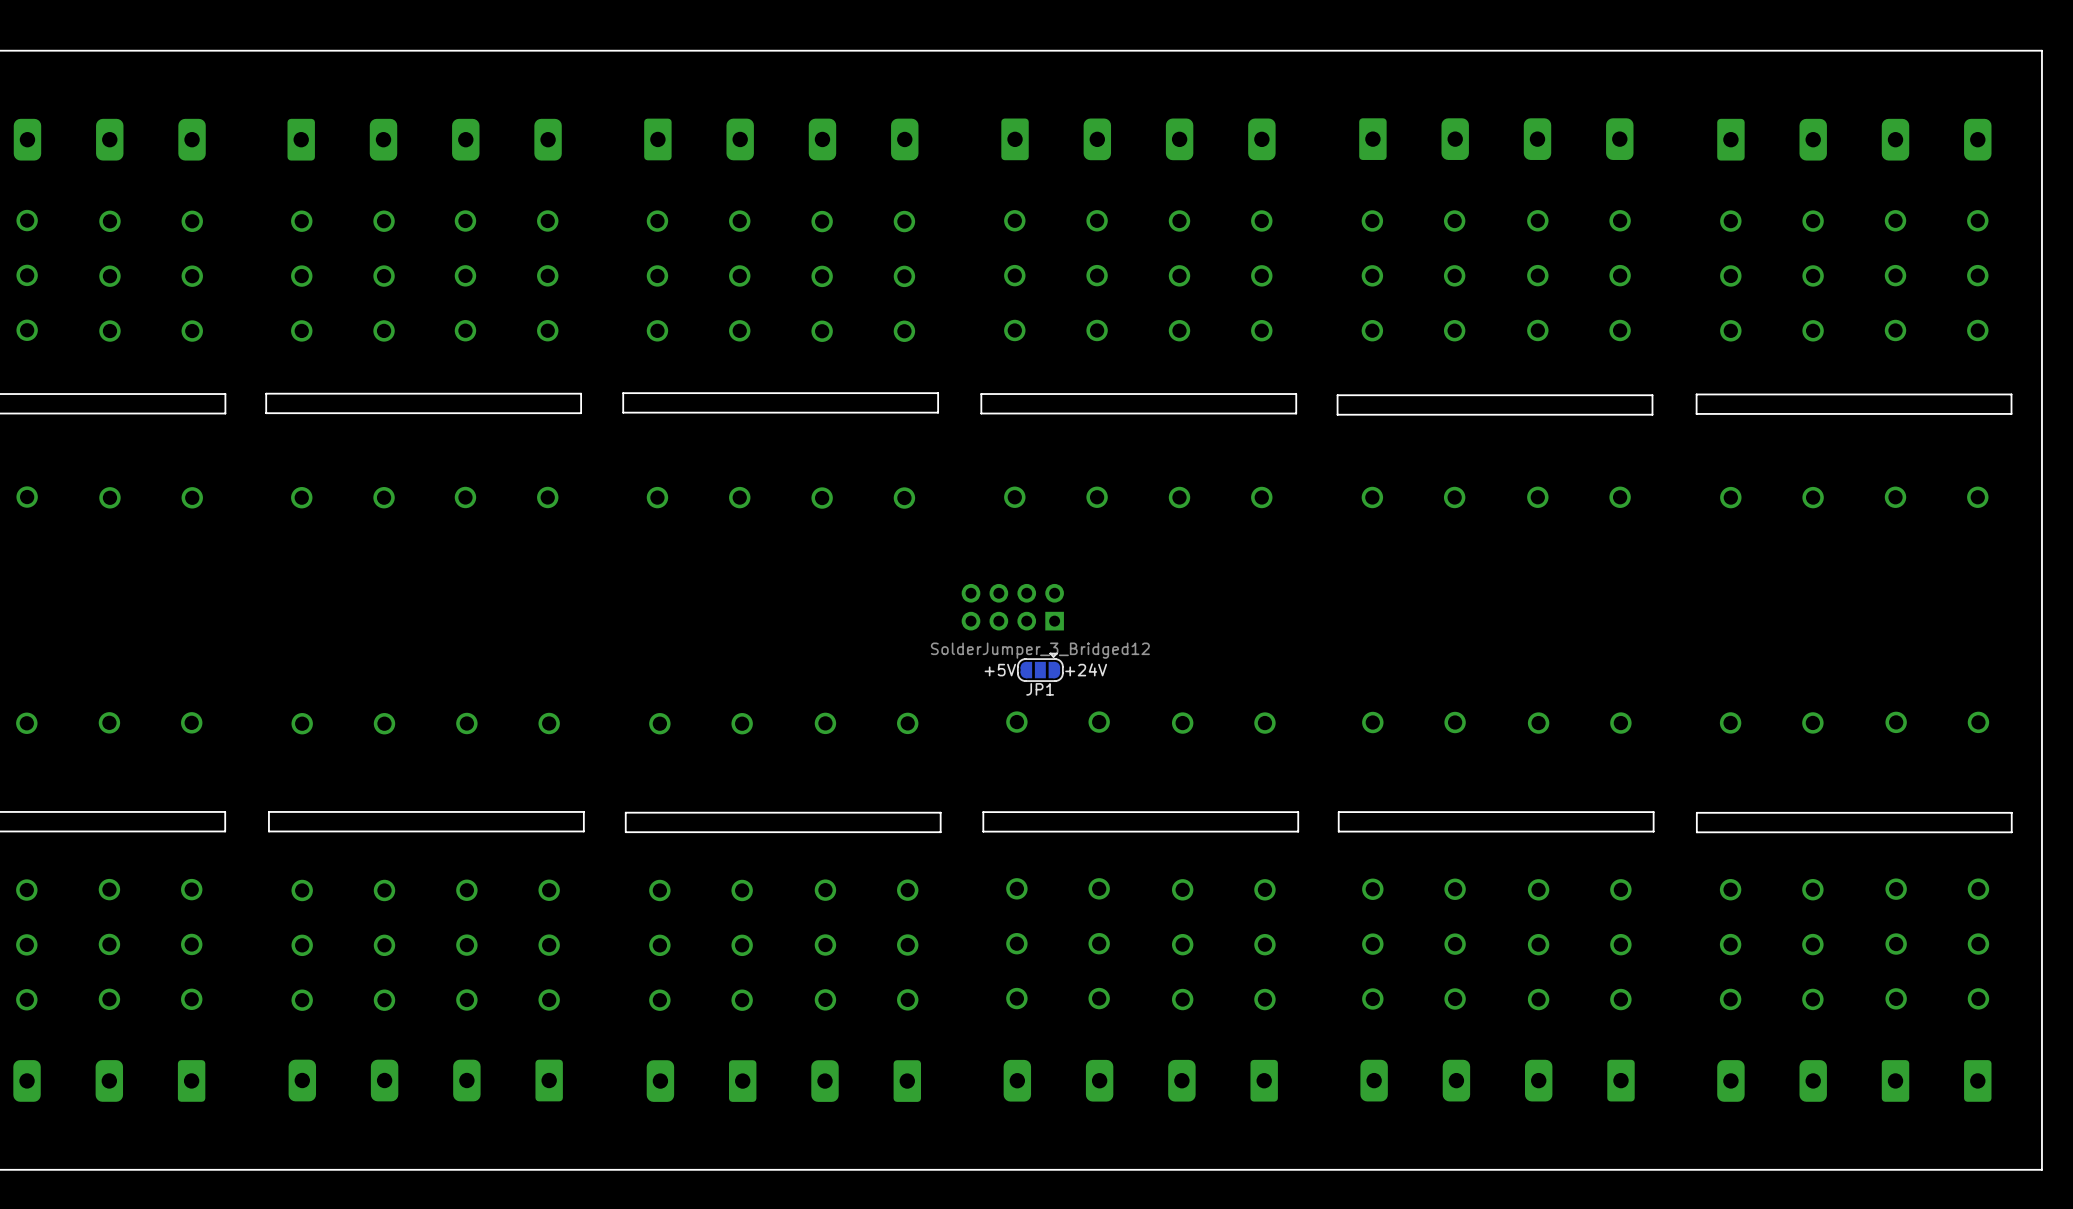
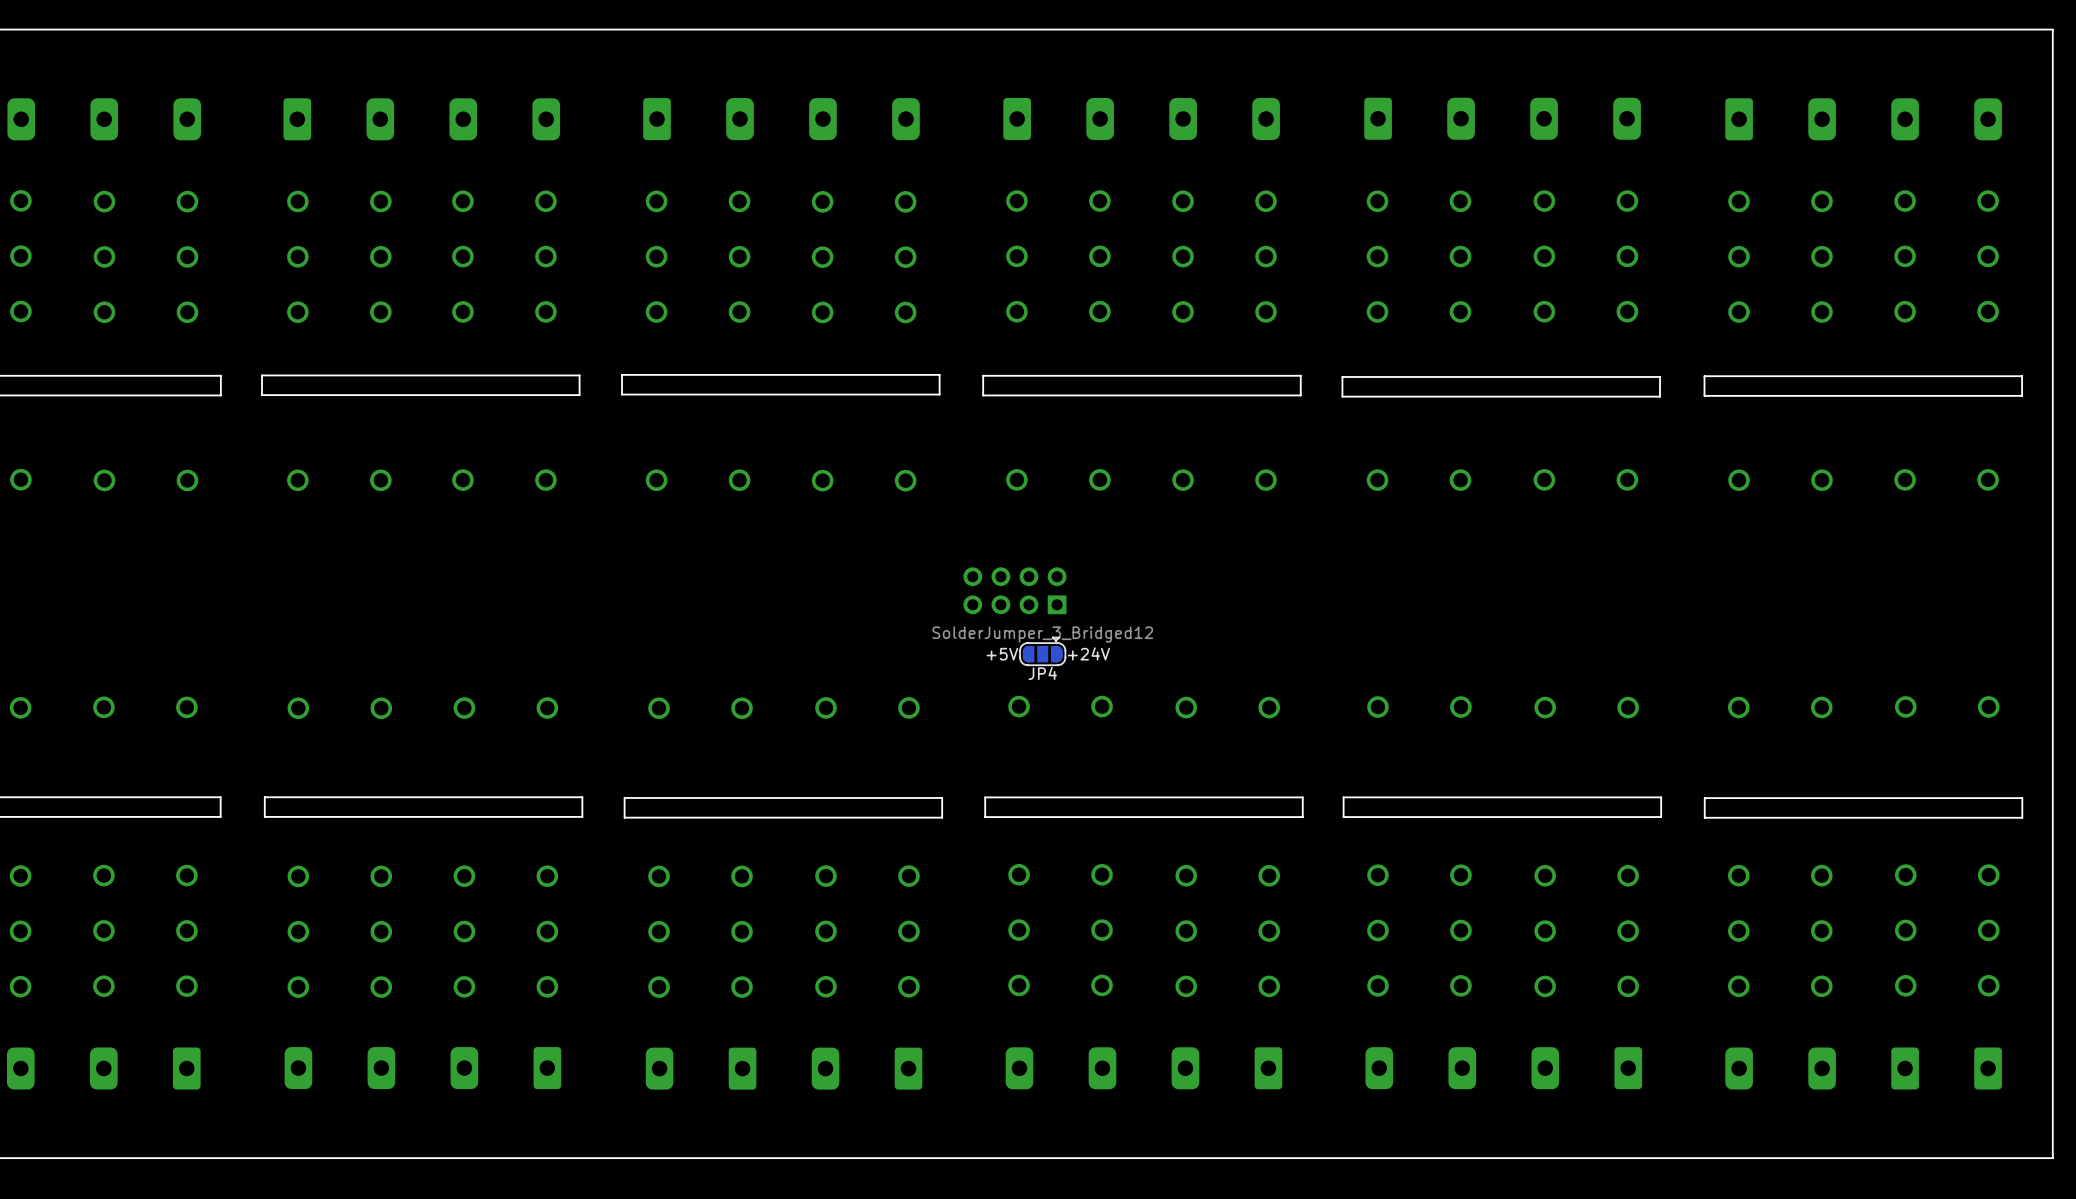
JP1 name: JP1 (1040, 689) -> JP4 (1042, 673)

